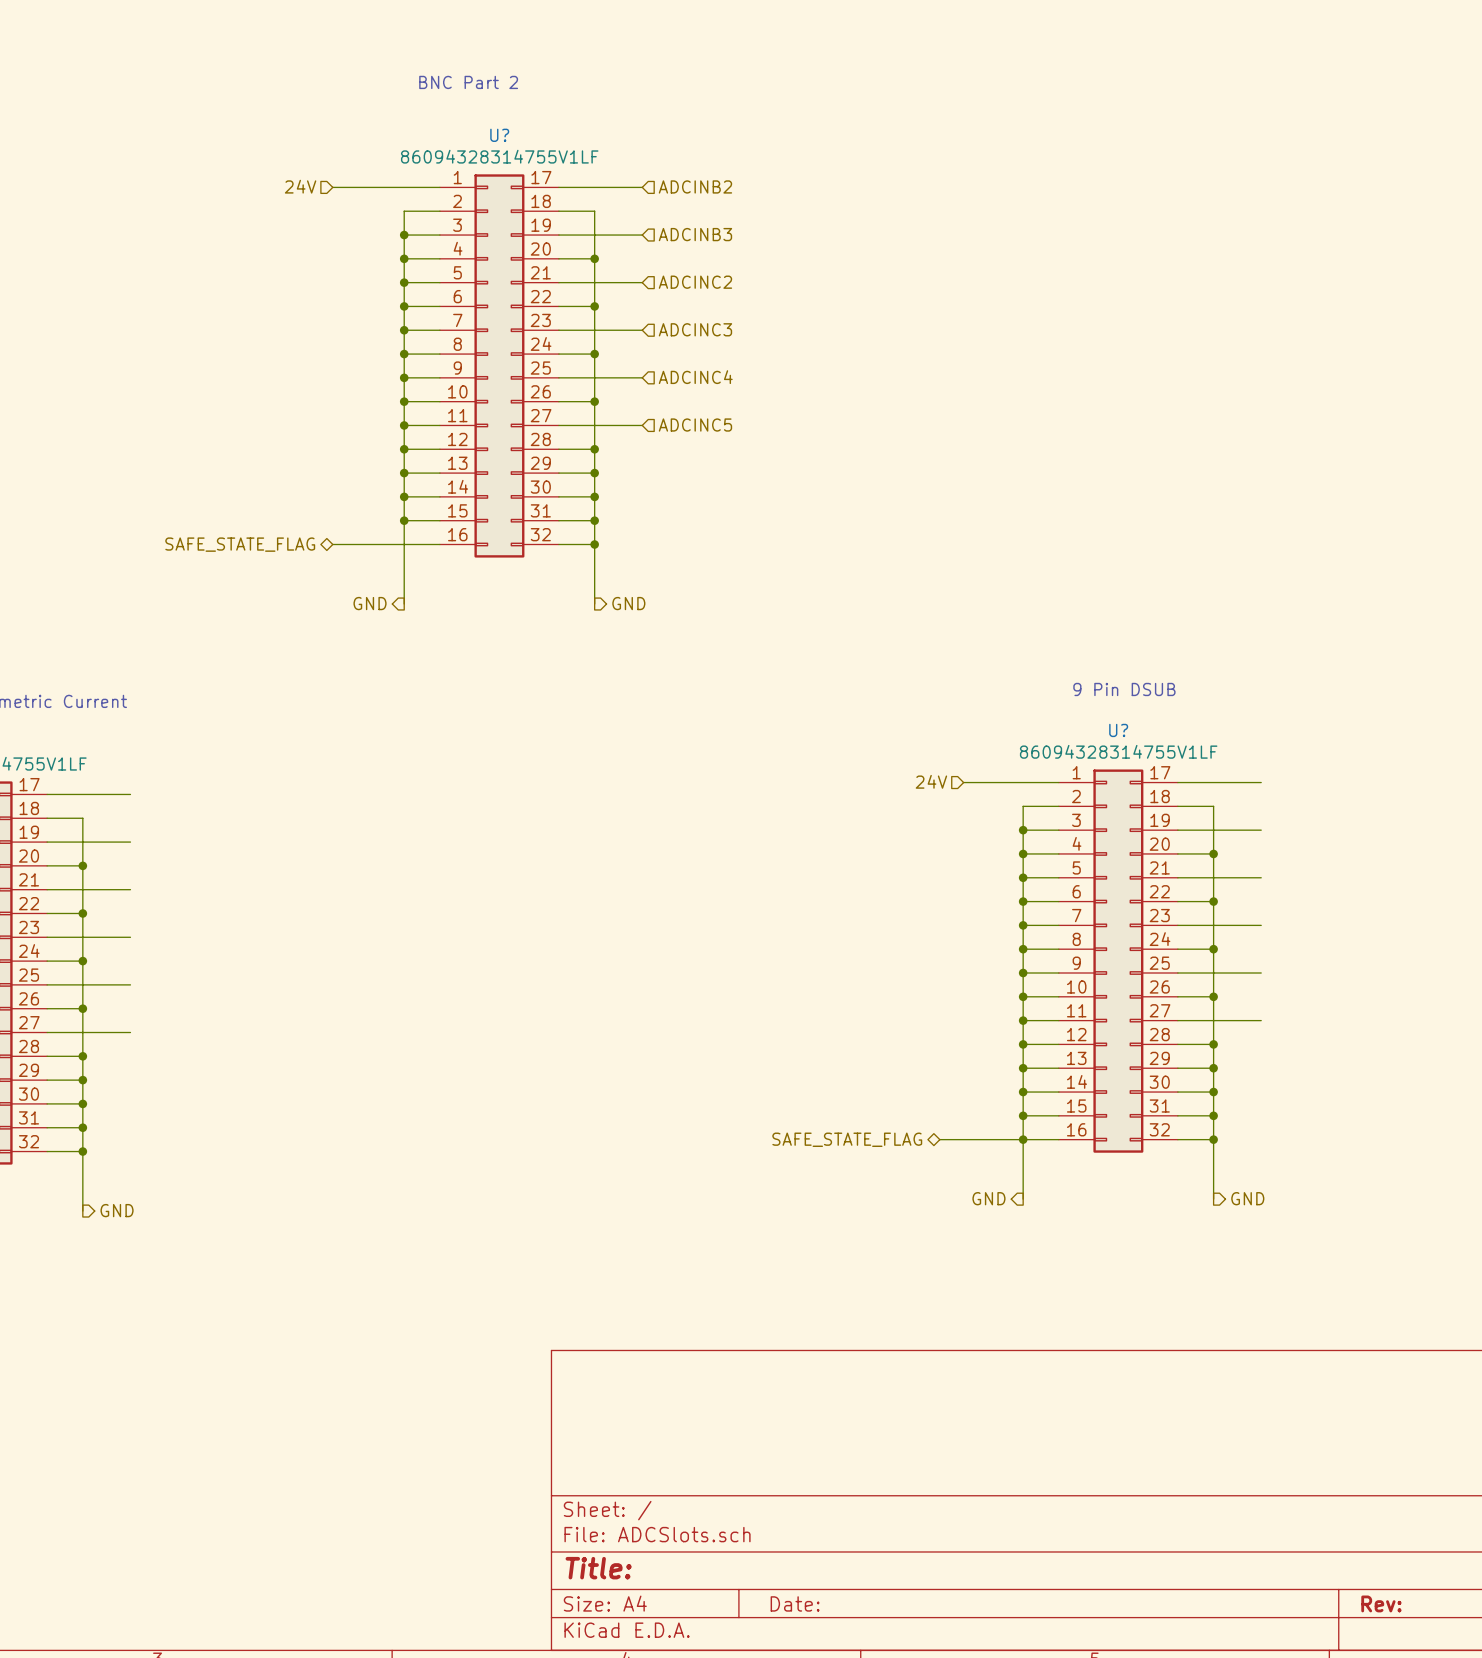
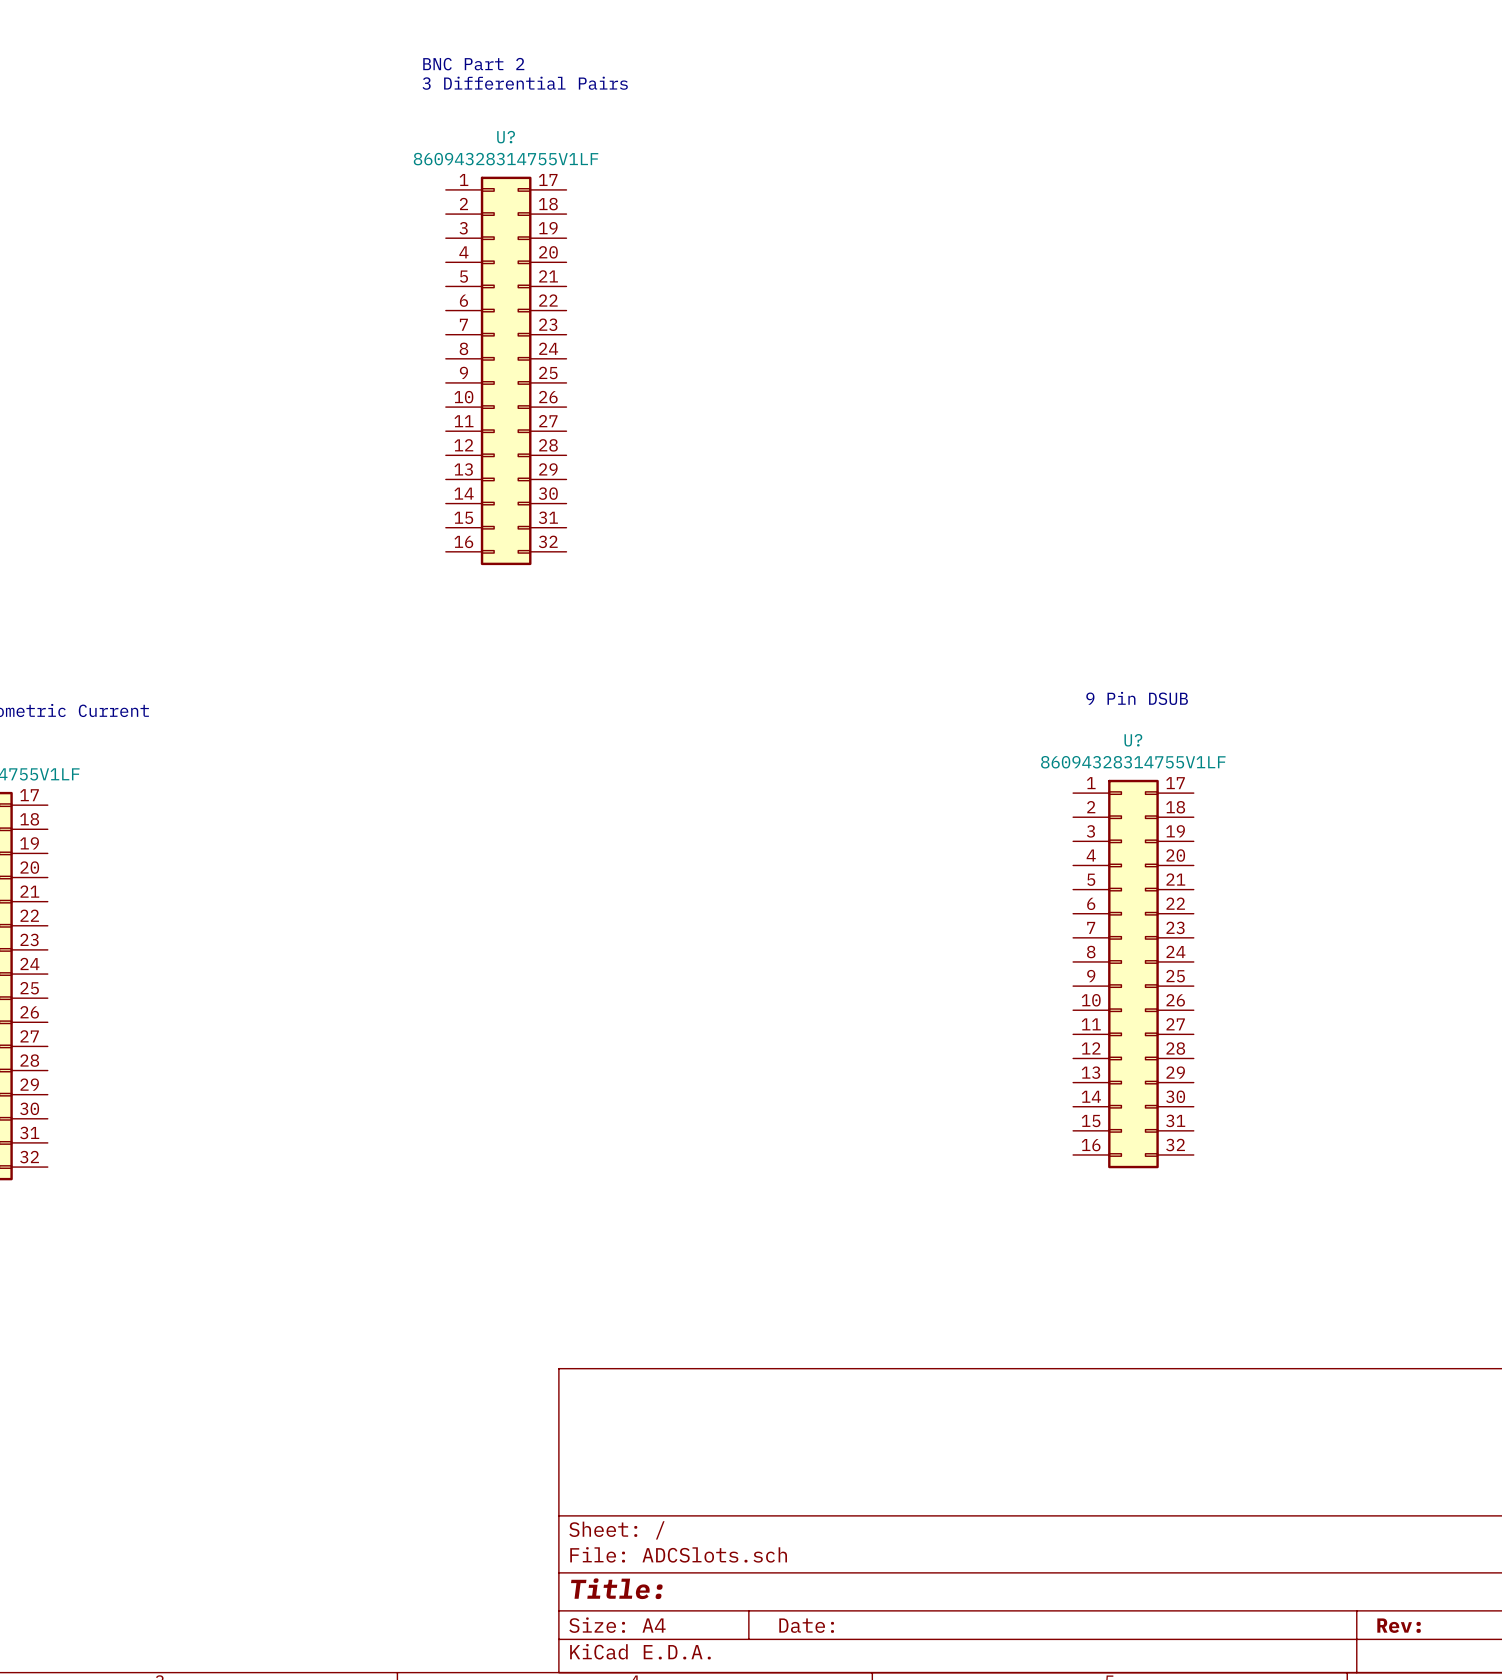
text: none -> BNC Part 2 (473, 64)
text: BNC Part 2 (468, 82) -> 3 Differential Pairs (525, 83)
hierarchical label: 24V (300, 186) -> none
hierarchical label: ADCINB2 (695, 186) -> none
wire: (332, 187) (439, 187) -> none
wire: (558, 187) (642, 187) -> none
wire: (439, 211) (404, 211) (404, 604) -> none
wire: (558, 211) (594, 211) (594, 604) -> none
hierarchical label: ADCINB3 (695, 234) -> none
wire: (404, 235) (439, 235) -> none
junction: (404, 235) -> none
wire: (558, 235) (642, 235) -> none
wire: (404, 258) (439, 258) -> none
junction: (404, 258) -> none
wire: (558, 258) (594, 258) -> none
junction: (594, 258) -> none
wire: (404, 282) (439, 282) -> none
junction: (404, 282) -> none
wire: (558, 282) (642, 282) -> none
hierarchical label: ADCINC2 (695, 282) -> none
wire: (404, 306) (439, 306) -> none
junction: (404, 306) -> none
wire: (558, 306) (594, 306) -> none
junction: (594, 306) -> none
hierarchical label: ADCINC3 (695, 329) -> none
wire: (404, 330) (439, 330) -> none
junction: (404, 330) -> none
wire: (558, 330) (642, 330) -> none
wire: (404, 354) (439, 354) -> none
junction: (404, 354) -> none
wire: (558, 354) (594, 354) -> none
junction: (594, 354) -> none
wire: (404, 377) (439, 377) -> none
junction: (404, 377) -> none
wire: (558, 377) (642, 377) -> none
hierarchical label: ADCINC4 (695, 377) -> none
wire: (404, 401) (439, 401) -> none
junction: (404, 401) -> none
wire: (558, 401) (594, 401) -> none
junction: (594, 401) -> none
wire: (404, 425) (439, 425) -> none
junction: (404, 425) -> none
wire: (558, 425) (642, 425) -> none
hierarchical label: ADCINC5 (695, 425) -> none
wire: (404, 449) (439, 449) -> none
junction: (404, 449) -> none
wire: (558, 449) (594, 449) -> none
junction: (594, 449) -> none
wire: (404, 473) (439, 473) -> none
junction: (404, 473) -> none
wire: (558, 473) (594, 473) -> none
junction: (594, 473) -> none
wire: (404, 496) (439, 496) -> none
junction: (404, 496) -> none
wire: (558, 496) (594, 496) -> none
junction: (594, 496) -> none
wire: (404, 520) (439, 520) -> none
junction: (404, 520) -> none
wire: (558, 520) (594, 520) -> none
junction: (594, 520) -> none
hierarchical label: SAFE_STATE_FLAG (240, 544) -> none
wire: (332, 544) (439, 544) -> none
wire: (558, 544) (594, 544) -> none
junction: (594, 544) -> none
hierarchical label: GND (370, 603) -> none
hierarchical label: GND (628, 603) -> none
hierarchical label: 24V (931, 781) -> none
wire: (963, 782) (1058, 782) -> none
wire: (1177, 782) (1261, 782) -> none
wire: (47, 794) (130, 794) -> none
wire: (1058, 806) (1023, 806) (1023, 1199) -> none
wire: (1177, 806) (1213, 806) (1213, 1199) -> none
wire: (47, 818) (82, 818) (82, 1211) -> none
wire: (1023, 830) (1058, 830) -> none
junction: (1023, 830) -> none
wire: (1177, 830) (1261, 830) -> none
wire: (47, 842) (130, 842) -> none
wire: (1023, 853) (1058, 853) -> none
junction: (1023, 853) -> none
wire: (1177, 853) (1213, 853) -> none
junction: (1213, 853) -> none
wire: (47, 865) (82, 865) -> none
junction: (82, 865) -> none
wire: (1023, 877) (1058, 877) -> none
junction: (1023, 877) -> none
wire: (1177, 877) (1261, 877) -> none
wire: (47, 889) (130, 889) -> none
wire: (1023, 901) (1058, 901) -> none
junction: (1023, 901) -> none
wire: (1177, 901) (1213, 901) -> none
junction: (1213, 901) -> none
wire: (47, 913) (82, 913) -> none
junction: (82, 913) -> none
wire: (1023, 925) (1058, 925) -> none
junction: (1023, 925) -> none
wire: (1177, 925) (1261, 925) -> none
wire: (47, 937) (130, 937) -> none
wire: (1023, 949) (1058, 949) -> none
junction: (1023, 949) -> none
wire: (1177, 949) (1213, 949) -> none
junction: (1213, 949) -> none
wire: (47, 961) (82, 961) -> none
junction: (82, 961) -> none
wire: (1023, 972) (1058, 972) -> none
junction: (1023, 972) -> none
wire: (1177, 972) (1261, 972) -> none
wire: (47, 984) (130, 984) -> none
wire: (1023, 996) (1058, 996) -> none
junction: (1023, 996) -> none
wire: (1177, 996) (1213, 996) -> none
junction: (1213, 996) -> none
wire: (47, 1008) (82, 1008) -> none
junction: (82, 1008) -> none
wire: (1023, 1020) (1058, 1020) -> none
junction: (1023, 1020) -> none
wire: (1177, 1020) (1261, 1020) -> none
wire: (47, 1032) (130, 1032) -> none
wire: (1023, 1044) (1058, 1044) -> none
junction: (1023, 1044) -> none
wire: (1177, 1044) (1213, 1044) -> none
junction: (1213, 1044) -> none
wire: (47, 1056) (82, 1056) -> none
junction: (82, 1056) -> none
wire: (1023, 1068) (1058, 1068) -> none
junction: (1023, 1068) -> none
wire: (1177, 1068) (1213, 1068) -> none
junction: (1213, 1068) -> none
wire: (47, 1080) (82, 1080) -> none
junction: (82, 1080) -> none
wire: (1023, 1092) (1058, 1092) -> none
junction: (1023, 1092) -> none
wire: (1177, 1092) (1213, 1092) -> none
junction: (1213, 1092) -> none
wire: (47, 1103) (82, 1103) -> none
junction: (82, 1103) -> none
wire: (1023, 1115) (1058, 1115) -> none
junction: (1023, 1115) -> none
wire: (1177, 1115) (1213, 1115) -> none
junction: (1213, 1115) -> none
wire: (47, 1127) (82, 1127) -> none
junction: (82, 1127) -> none
hierarchical label: SAFE_STATE_FLAG (847, 1139) -> none
wire: (939, 1139) (1058, 1139) -> none
junction: (1023, 1139) -> none
wire: (1177, 1139) (1213, 1139) -> none
junction: (1213, 1139) -> none
wire: (47, 1151) (82, 1151) -> none
junction: (82, 1151) -> none
hierarchical label: GND (988, 1198) -> none
hierarchical label: GND (1247, 1198) -> none
hierarchical label: GND (117, 1210) -> none

